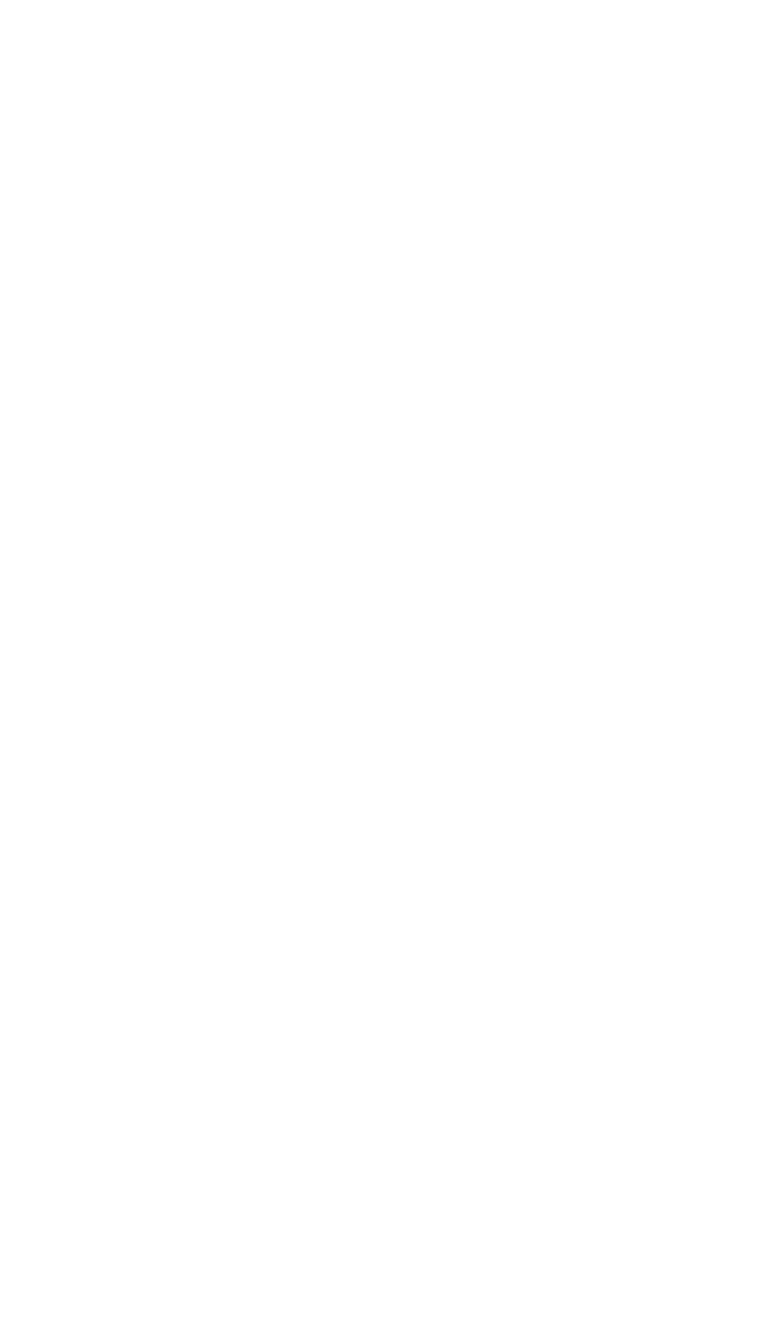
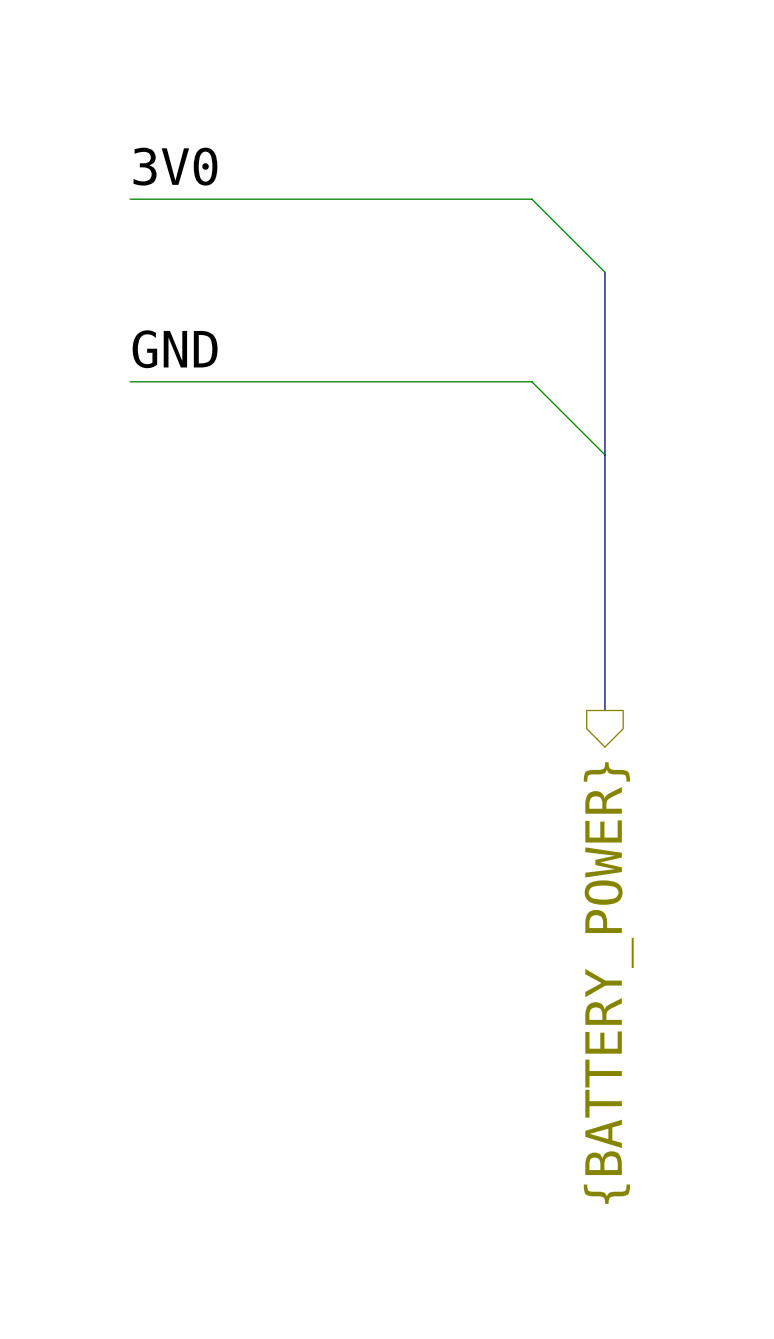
label: none -> 3V0 (175, 166)
wire: none -> (130, 199) (531, 199) (604, 272)
bus: none -> (604, 272) (604, 710)
label: none -> GND (175, 349)
wire: none -> (130, 381) (531, 381) (604, 454)
hierarchical label: none -> {BATTERY_POWER} (608, 983)

